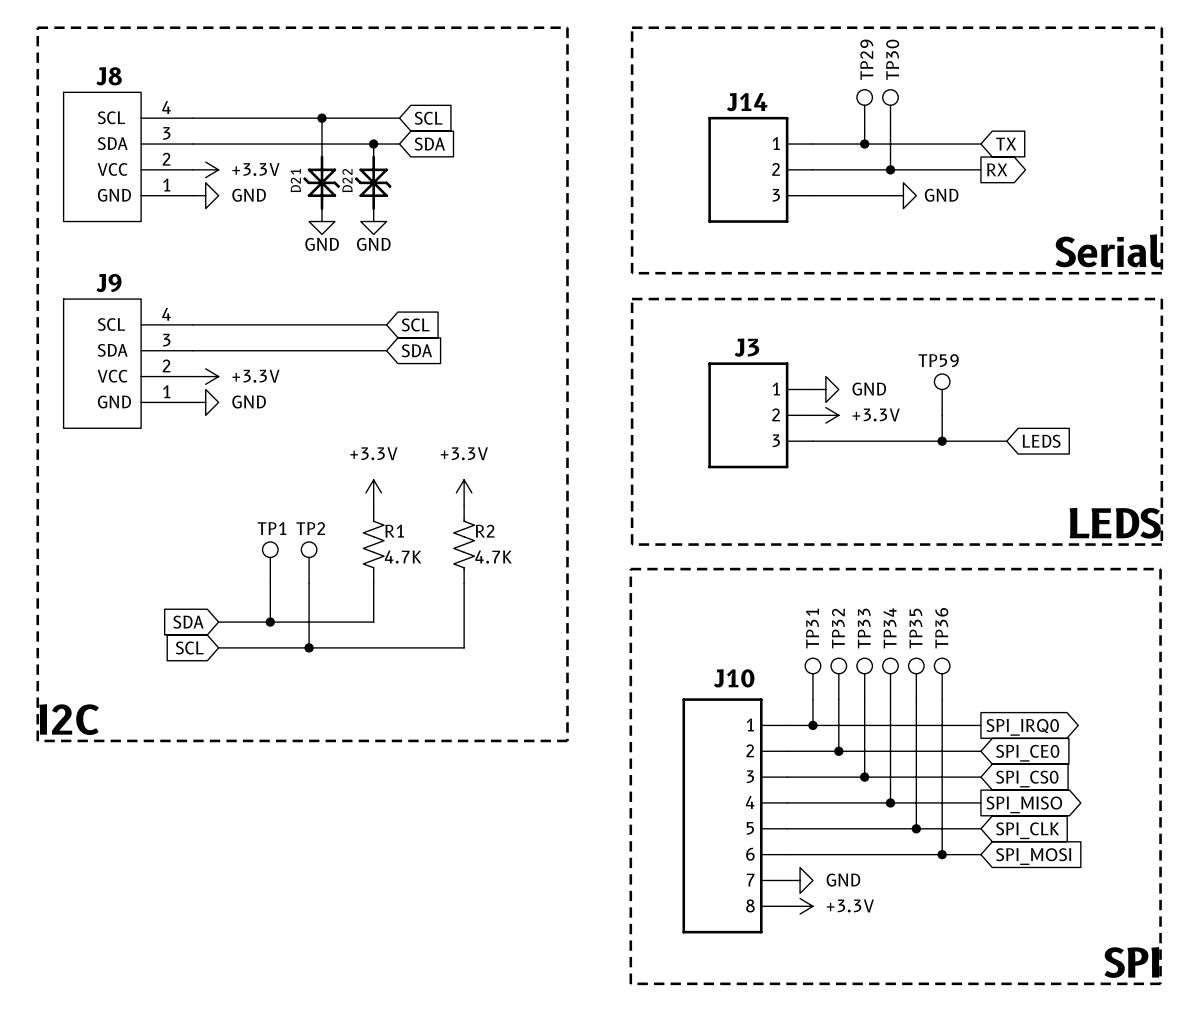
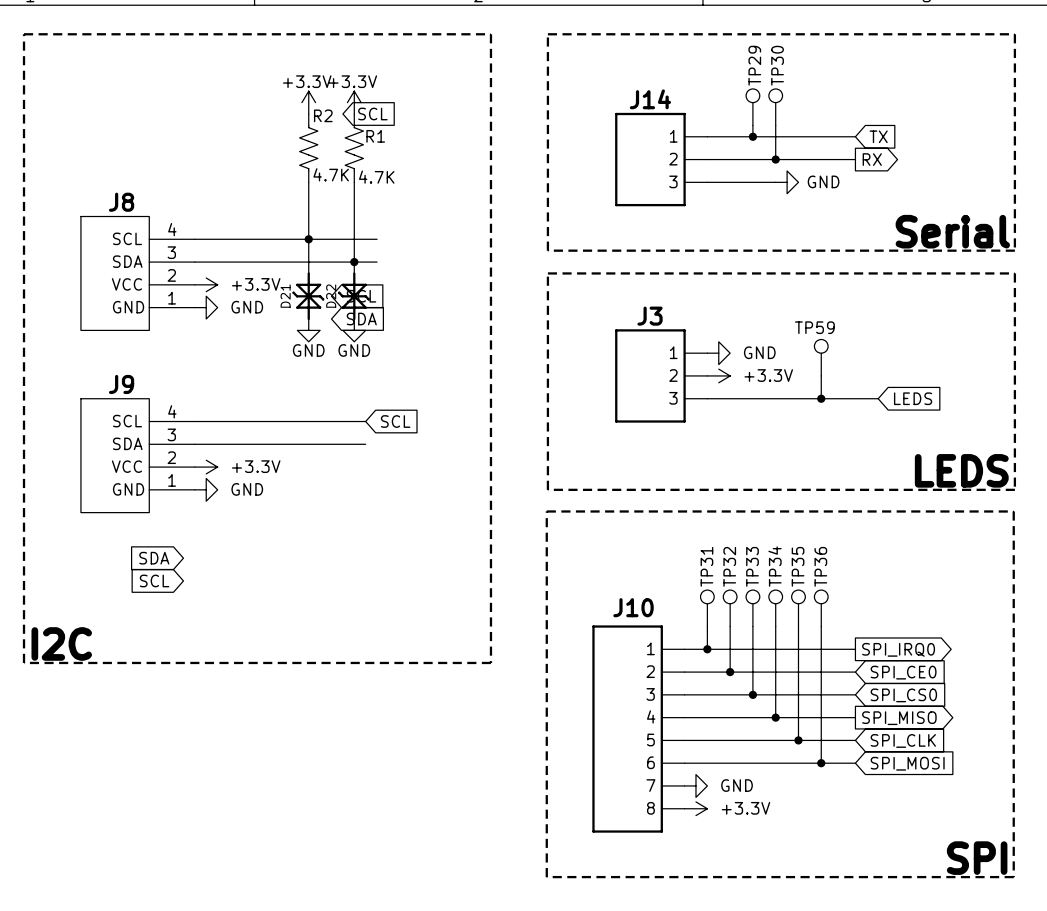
power symbol: none -> +3.3V (308, 102)
power symbol: none -> +3.3V (354, 102)
wire: (192, 118) (399, 118) -> (194, 239) (377, 239)
wire: (322, 118) (322, 156) -> none
junction: (322, 118) -> none
wire: (192, 144) (399, 144) -> (194, 262) (377, 262)
wire: (373, 144) (373, 156) -> none
junction: (373, 144) -> none
global label: SDA (429, 144) -> none
J8 position: (128, 156) -> (137, 273)
power symbol: +3.3V (205, 169) -> none
D21 position: (321, 182) -> (308, 296)
D22 position: (373, 182) -> (353, 296)
power symbol: GND (205, 195) -> none
wire: none -> (308, 182) (308, 273)
wire: none -> (354, 182) (354, 273)
power symbol: GND (322, 221) -> none
power symbol: GND (373, 221) -> none
junction: none -> (308, 239)
junction: none -> (354, 262)
power symbol: none -> +3.3V (206, 284)
wire: (192, 324) (386, 324) -> (194, 421) (365, 421)
power symbol: none -> GND (206, 307)
wire: (192, 350) (386, 350) -> (194, 444) (365, 444)
J9 position: (128, 363) -> (137, 455)
power symbol: none -> GND (308, 330)
power symbol: none -> GND (354, 330)
power symbol: +3.3V (205, 376) -> none
power symbol: GND (205, 402) -> none
global label: none -> SCL (395, 421)
power symbol: +3.3V (373, 492) -> none
power symbol: +3.3V (464, 492) -> none
power symbol: none -> +3.3V (206, 467)
R2 name position: R2 (485, 531) -> R2 (323, 115)
power symbol: none -> GND (206, 489)
R1 position: (373, 544) -> (354, 148)
R2 position: (464, 544) -> (308, 148)
R1 value position: 4.7K (403, 557) -> 4.7K (376, 177)
R2 value position: 4.7K (493, 557) -> 4.7K (331, 174)
TP1: (270, 562) -> none
TP2: (309, 562) -> none
wire: (270, 583) (270, 622) -> none
wire: (309, 583) (309, 647) -> none
wire: (373, 583) (373, 622) (218, 622) -> none
wire: (464, 583) (464, 647) (218, 647) -> none
junction: (270, 622) -> none
junction: (309, 647) -> none

